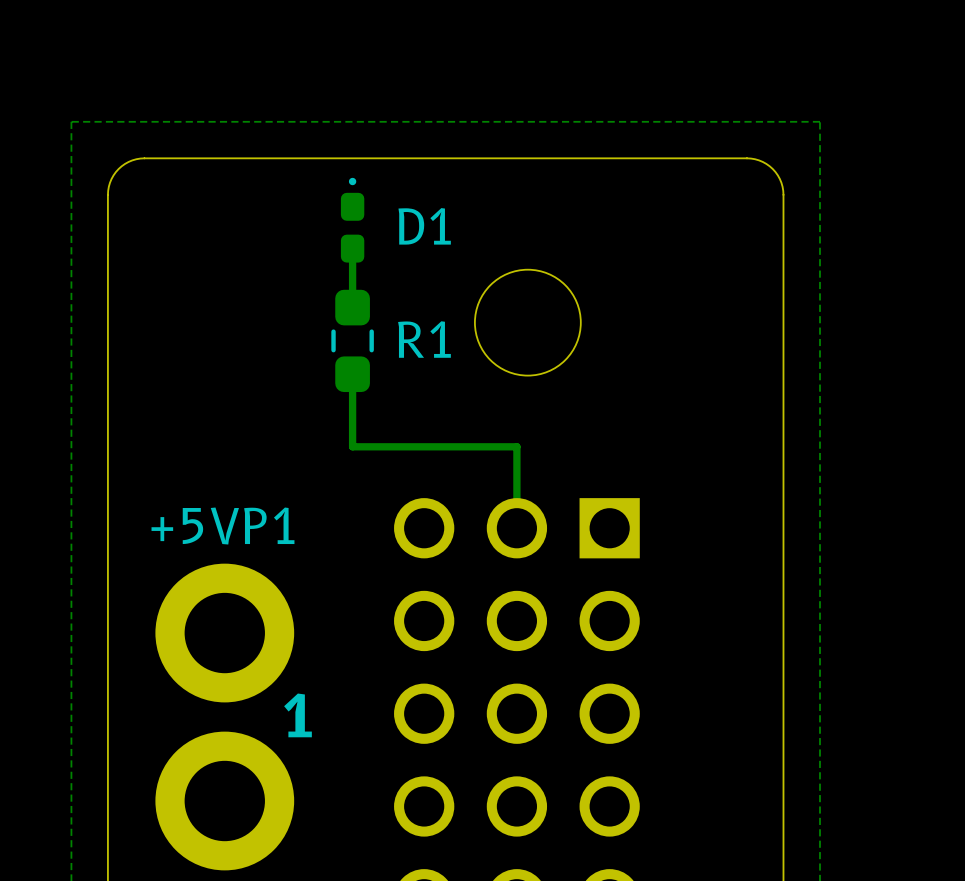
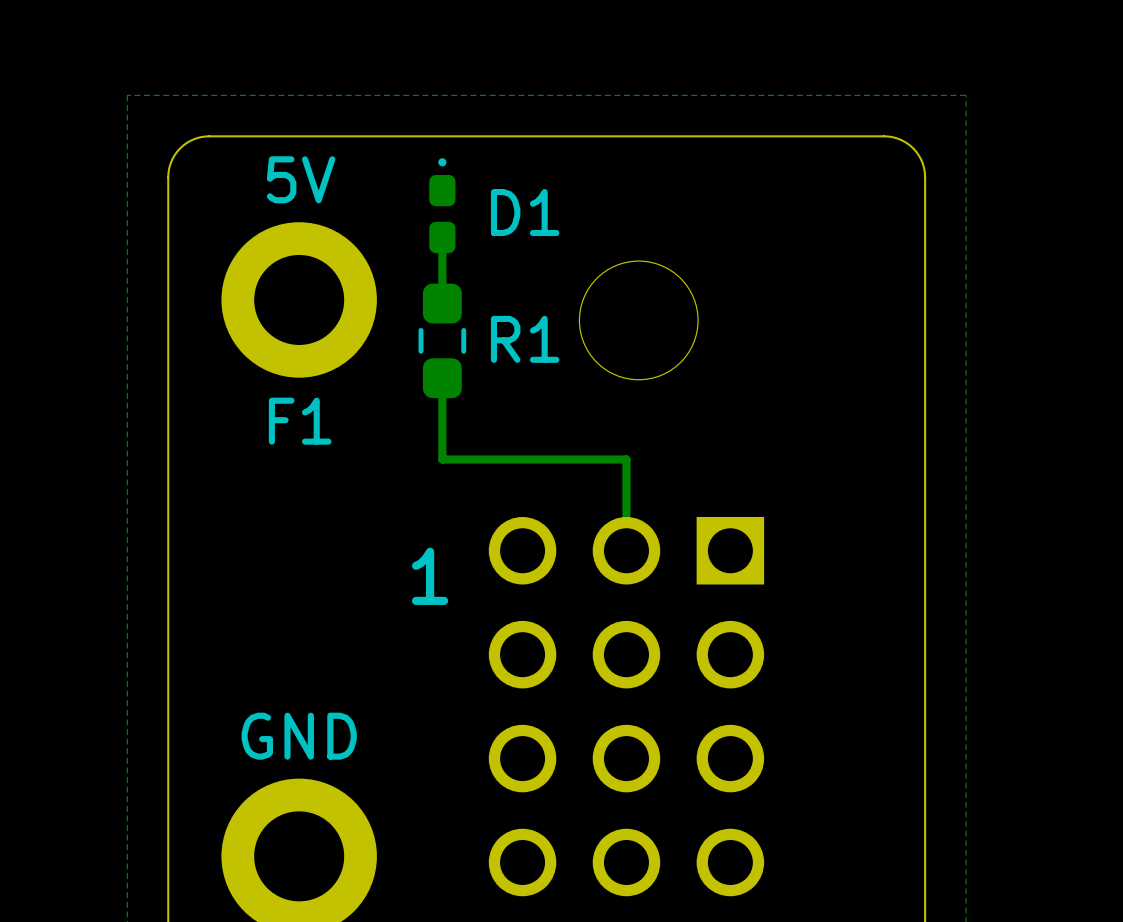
text: none -> 5V (301, 179)
text: none -> F1 (300, 421)
+5VP1 position: (224, 633) -> (299, 299)
text: none -> GND (299, 736)
text position: 1 (298, 715) -> 1 (430, 576)

